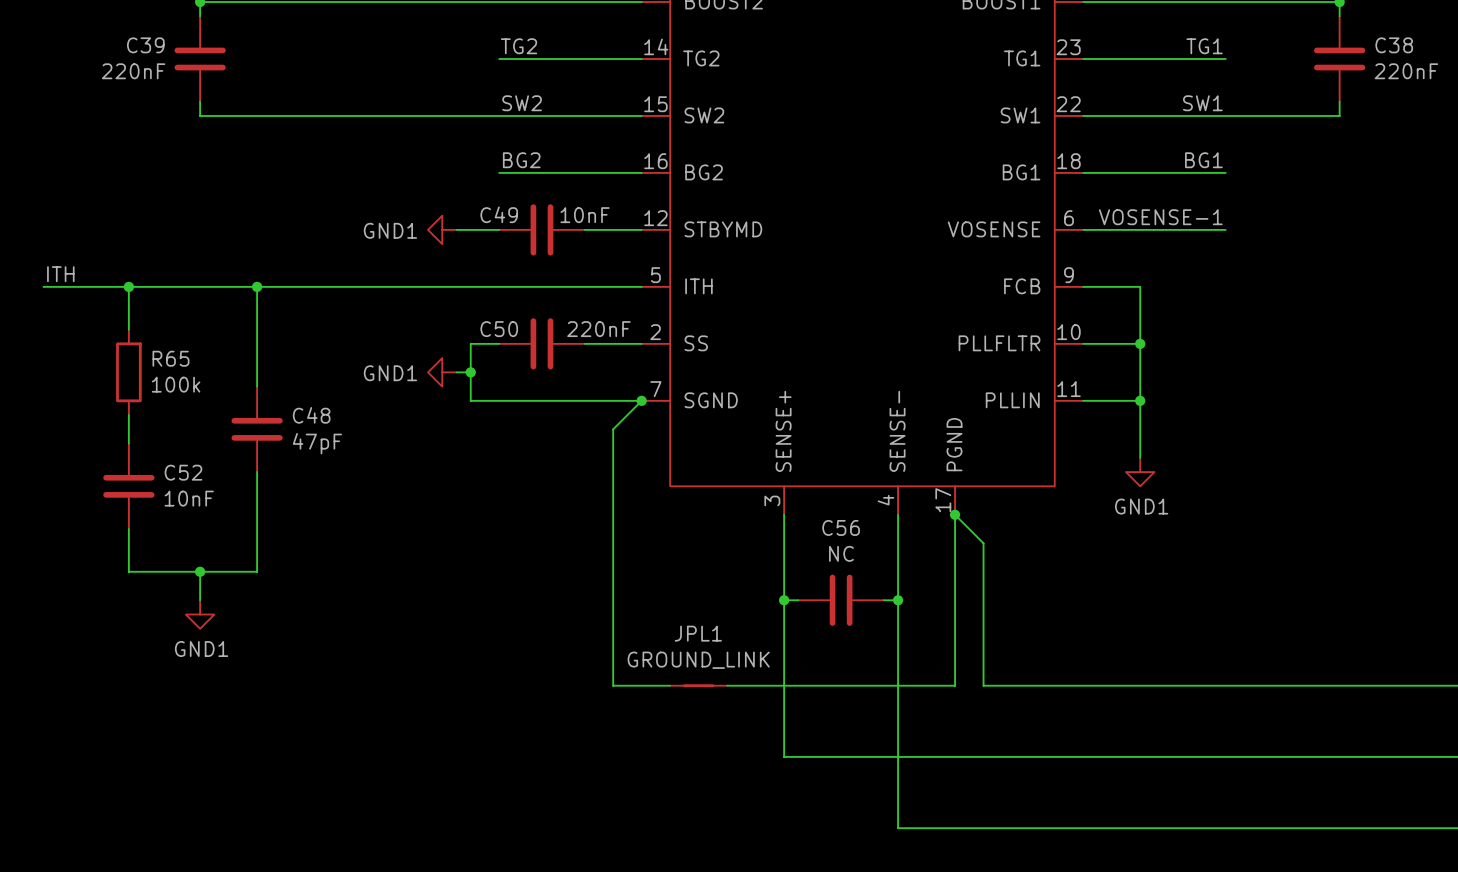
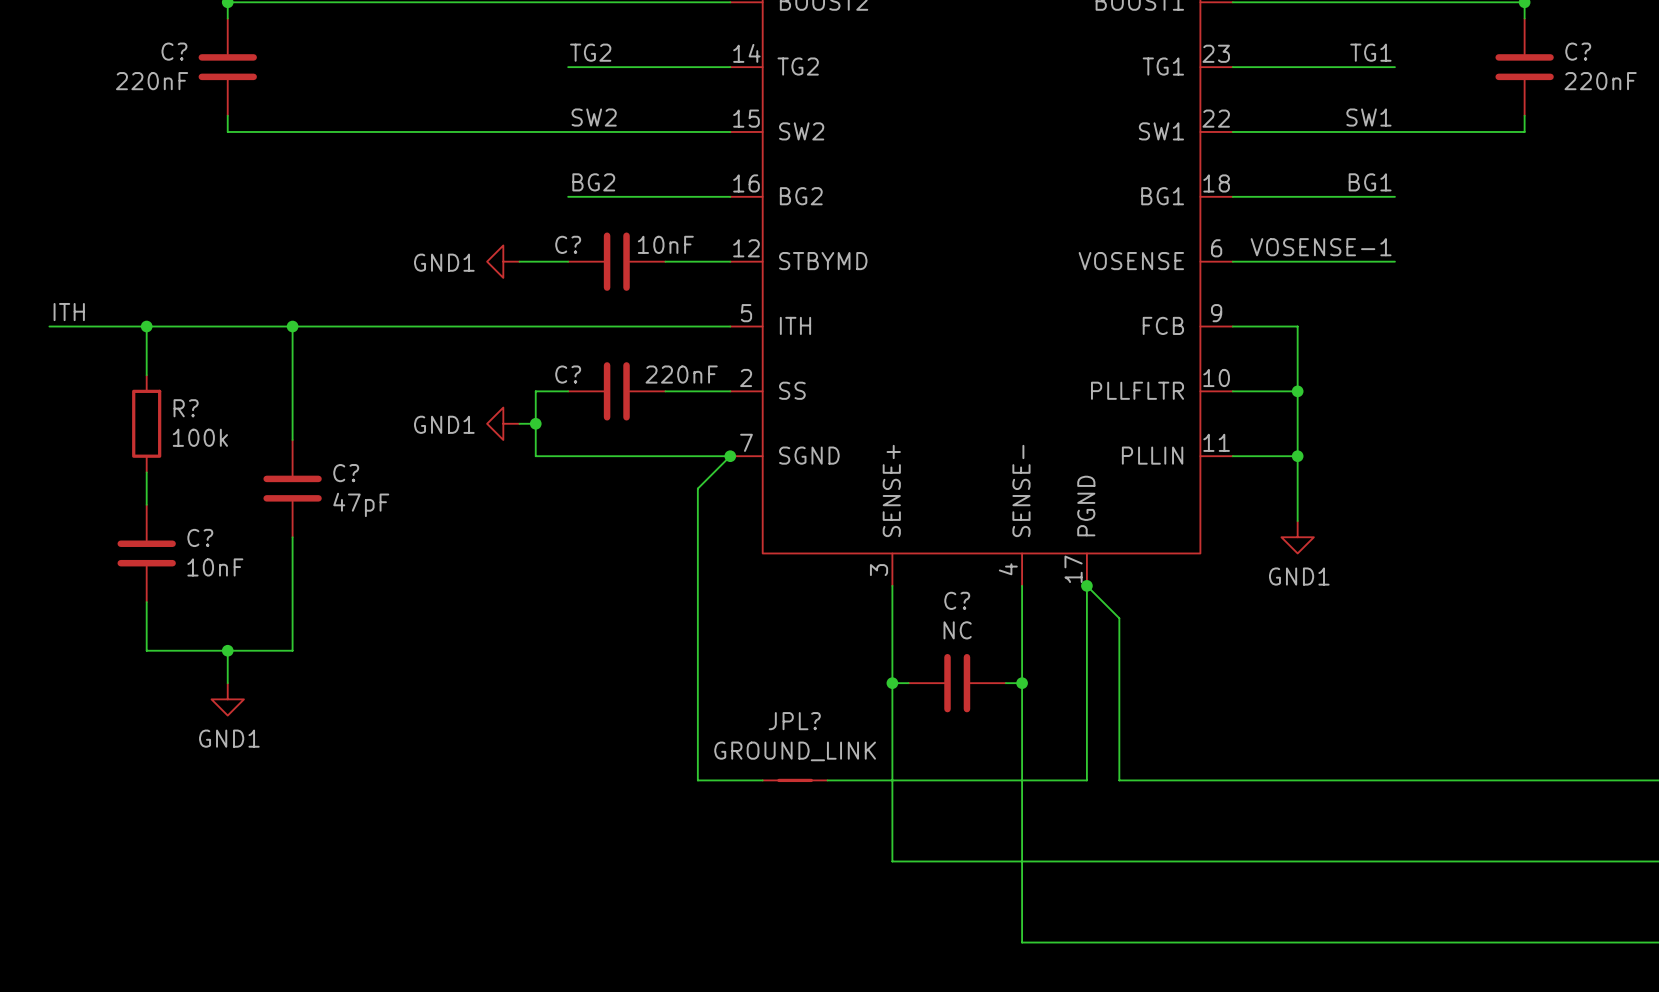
C39 name: C39 (145, 45) -> C? (174, 51)
C38 name: C38 (1394, 45) -> C? (1578, 51)
C49 name: C49 (499, 214) -> C? (568, 244)
C50 name: C50 (499, 329) -> C? (568, 374)
R65 name: R65 (170, 358) -> R? (186, 408)
C48 name: C48 (311, 415) -> C? (346, 473)
C52 name: C52 (183, 472) -> C? (200, 537)
C56 name: C56 (841, 527) -> C? (957, 600)
JPL1 name: JPL1 (698, 633) -> JPL? (794, 721)

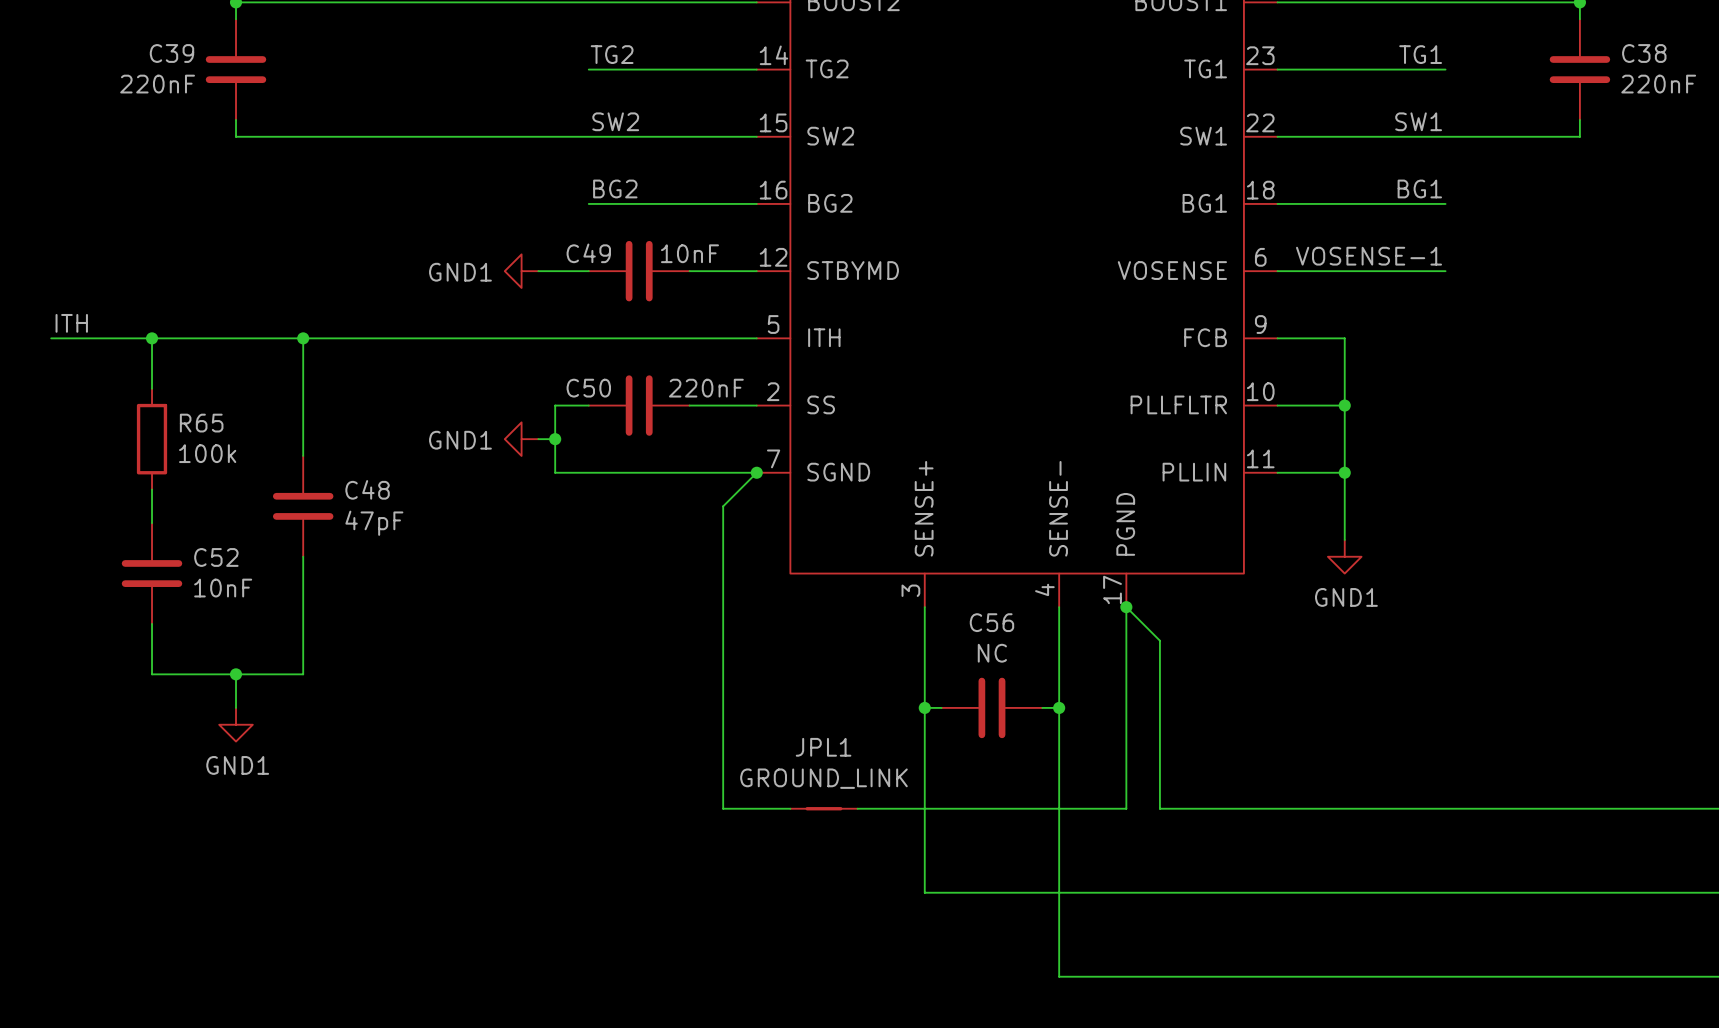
C? name: C? (174, 51) -> C39 (171, 53)
C? name: C? (1578, 51) -> C38 (1644, 53)
C? name: C? (568, 244) -> C49 (588, 253)
C? name: C? (568, 374) -> C50 (588, 388)
R? name: R? (186, 408) -> R65 (201, 423)
C? name: C? (346, 473) -> C48 (367, 489)
C? name: C? (200, 537) -> C52 (216, 557)
C? name: C? (957, 600) -> C56 (991, 622)
JPL? name: JPL? (794, 721) -> JPL1 (823, 747)

